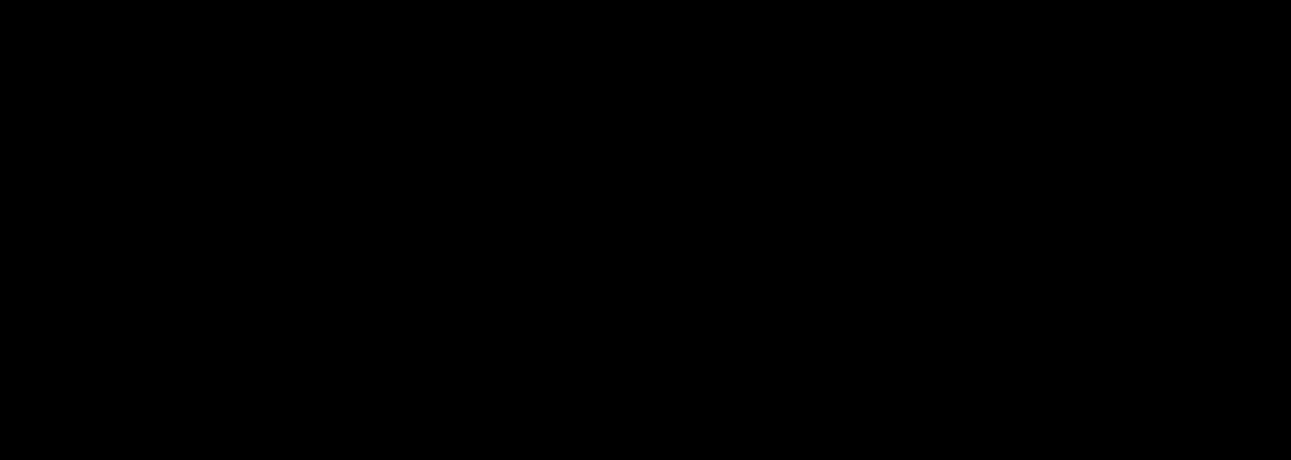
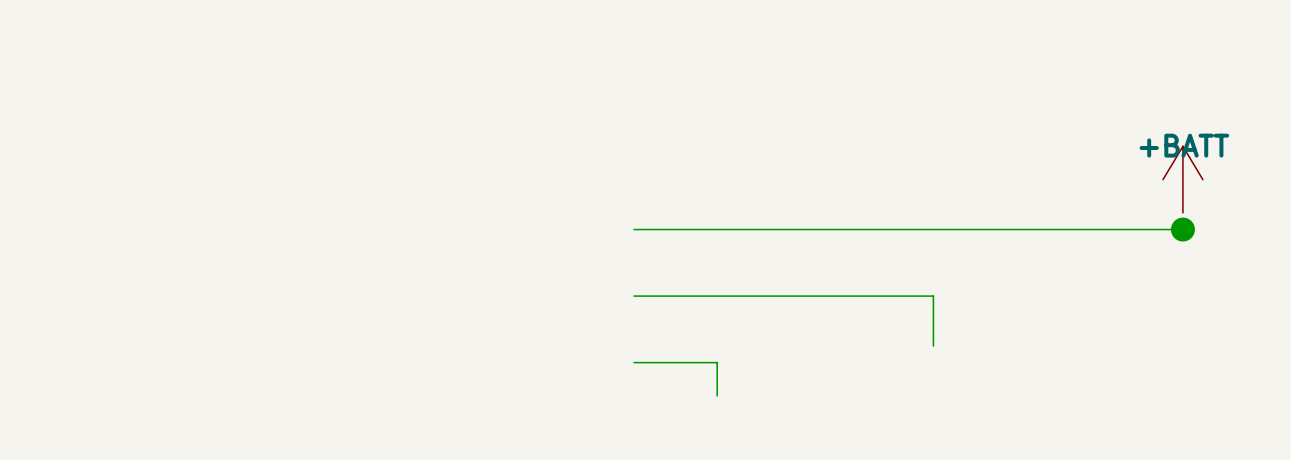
power symbol: none -> +BATT (1182, 179)
wire: none -> (634, 229) (1182, 229)
junction: none -> (1182, 229)
wire: none -> (634, 296) (933, 296) (933, 345)
wire: none -> (634, 362) (717, 362) (717, 395)

